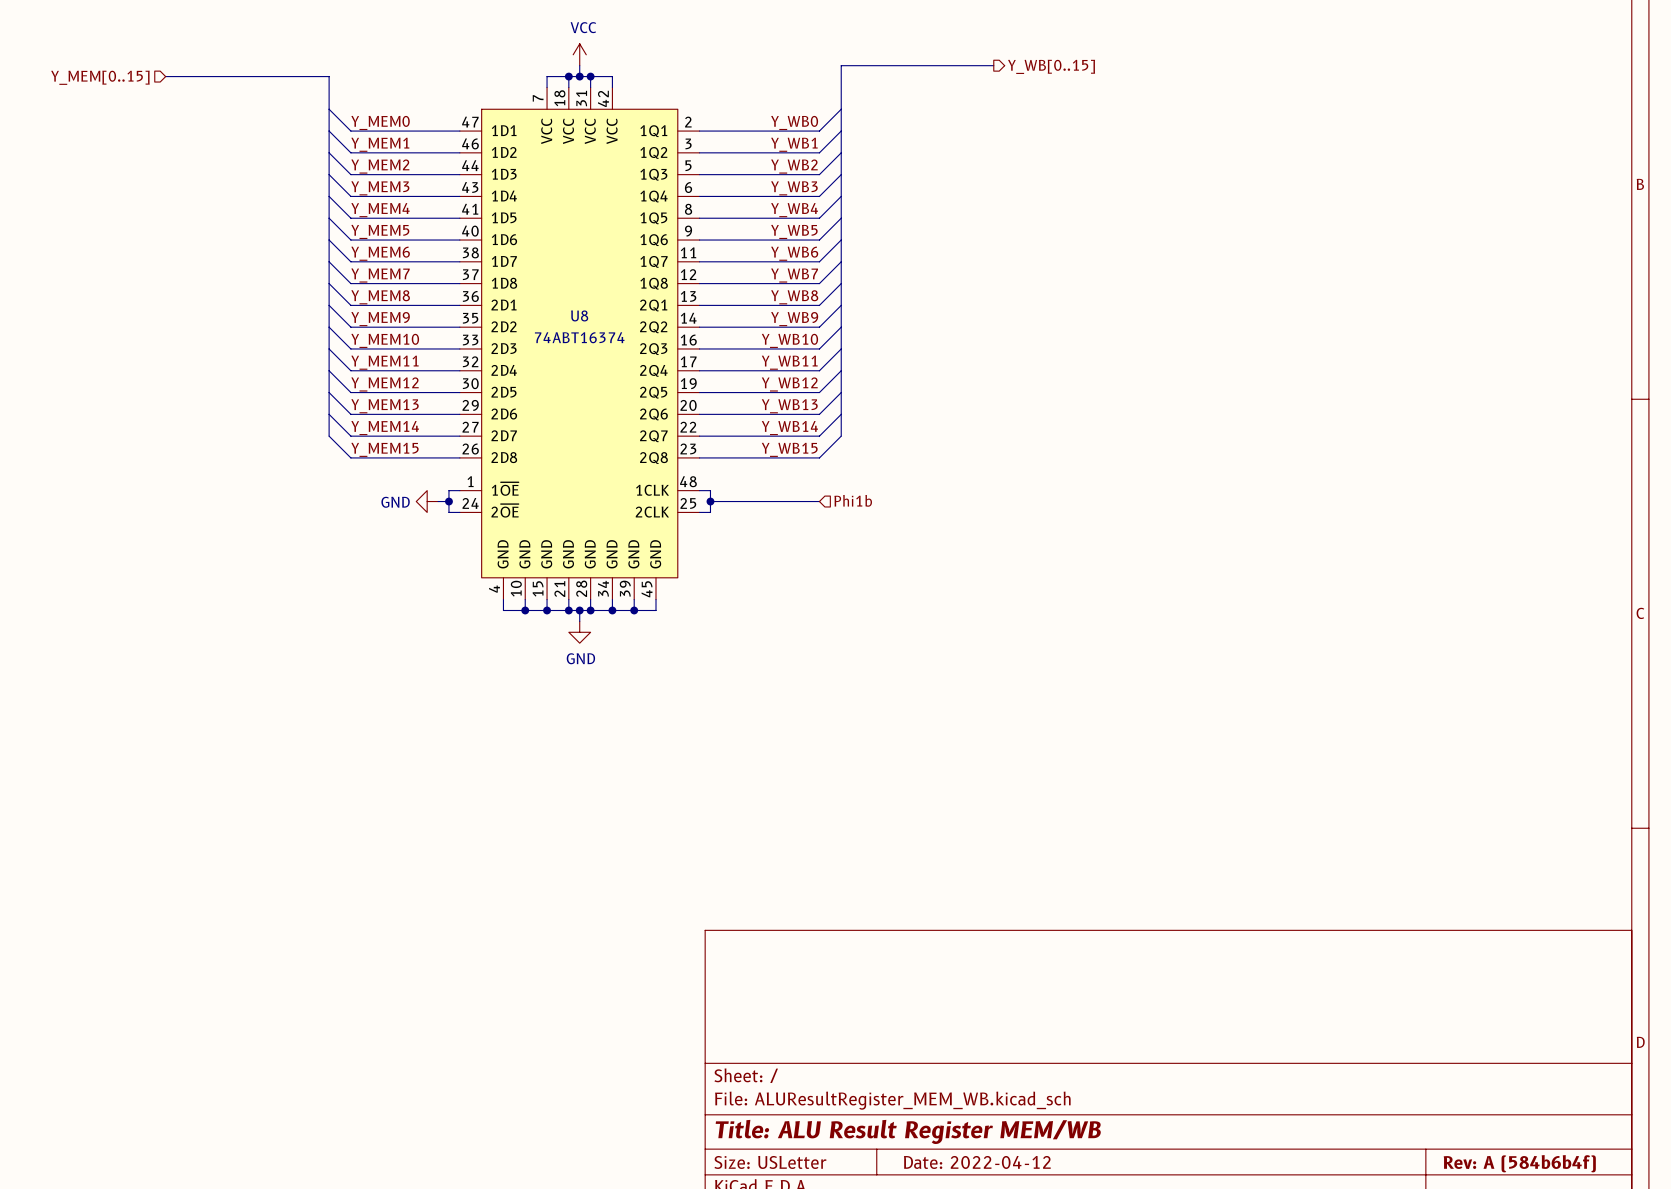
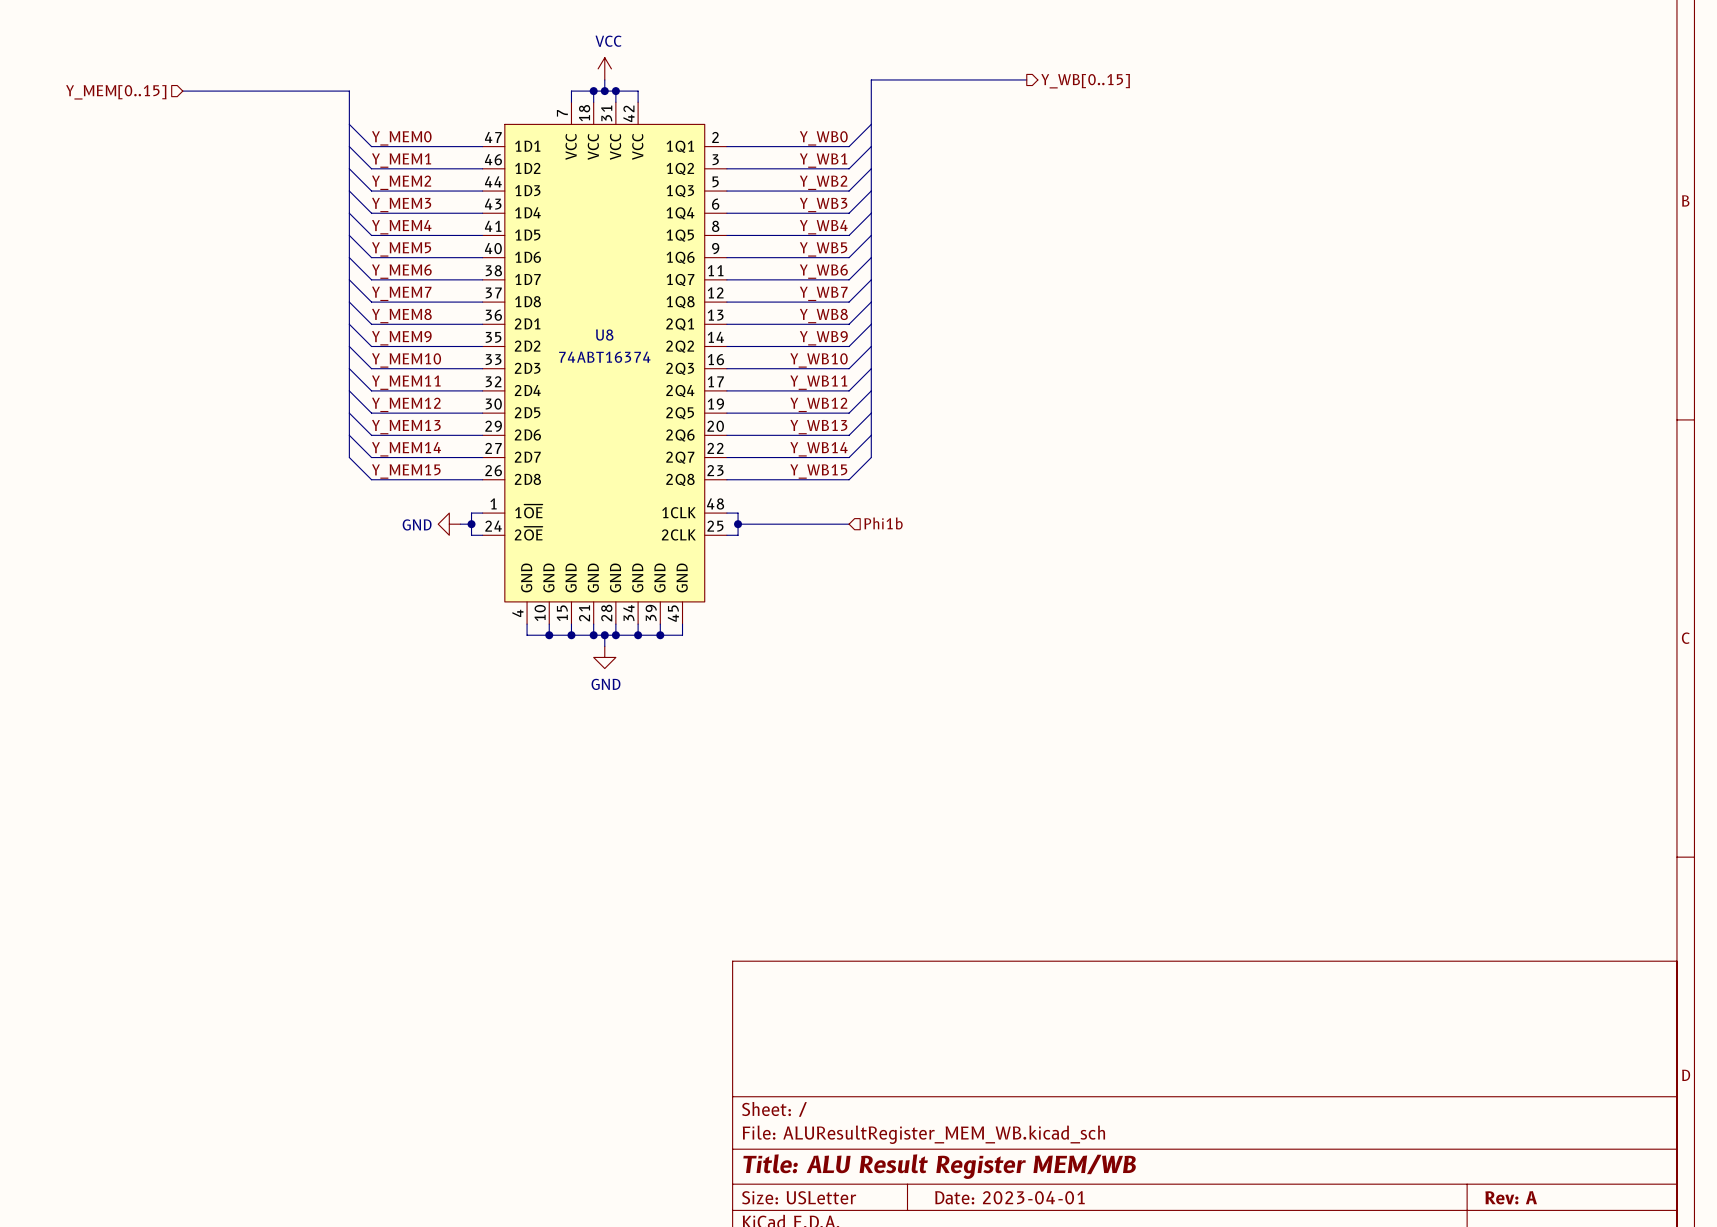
title block: Date: 2022-04-12 (977, 1162) -> Date: 2023-04-01 (1009, 1197)
title block: Rev: A (584b6b4f) (1519, 1163) -> Rev: A (1511, 1197)

